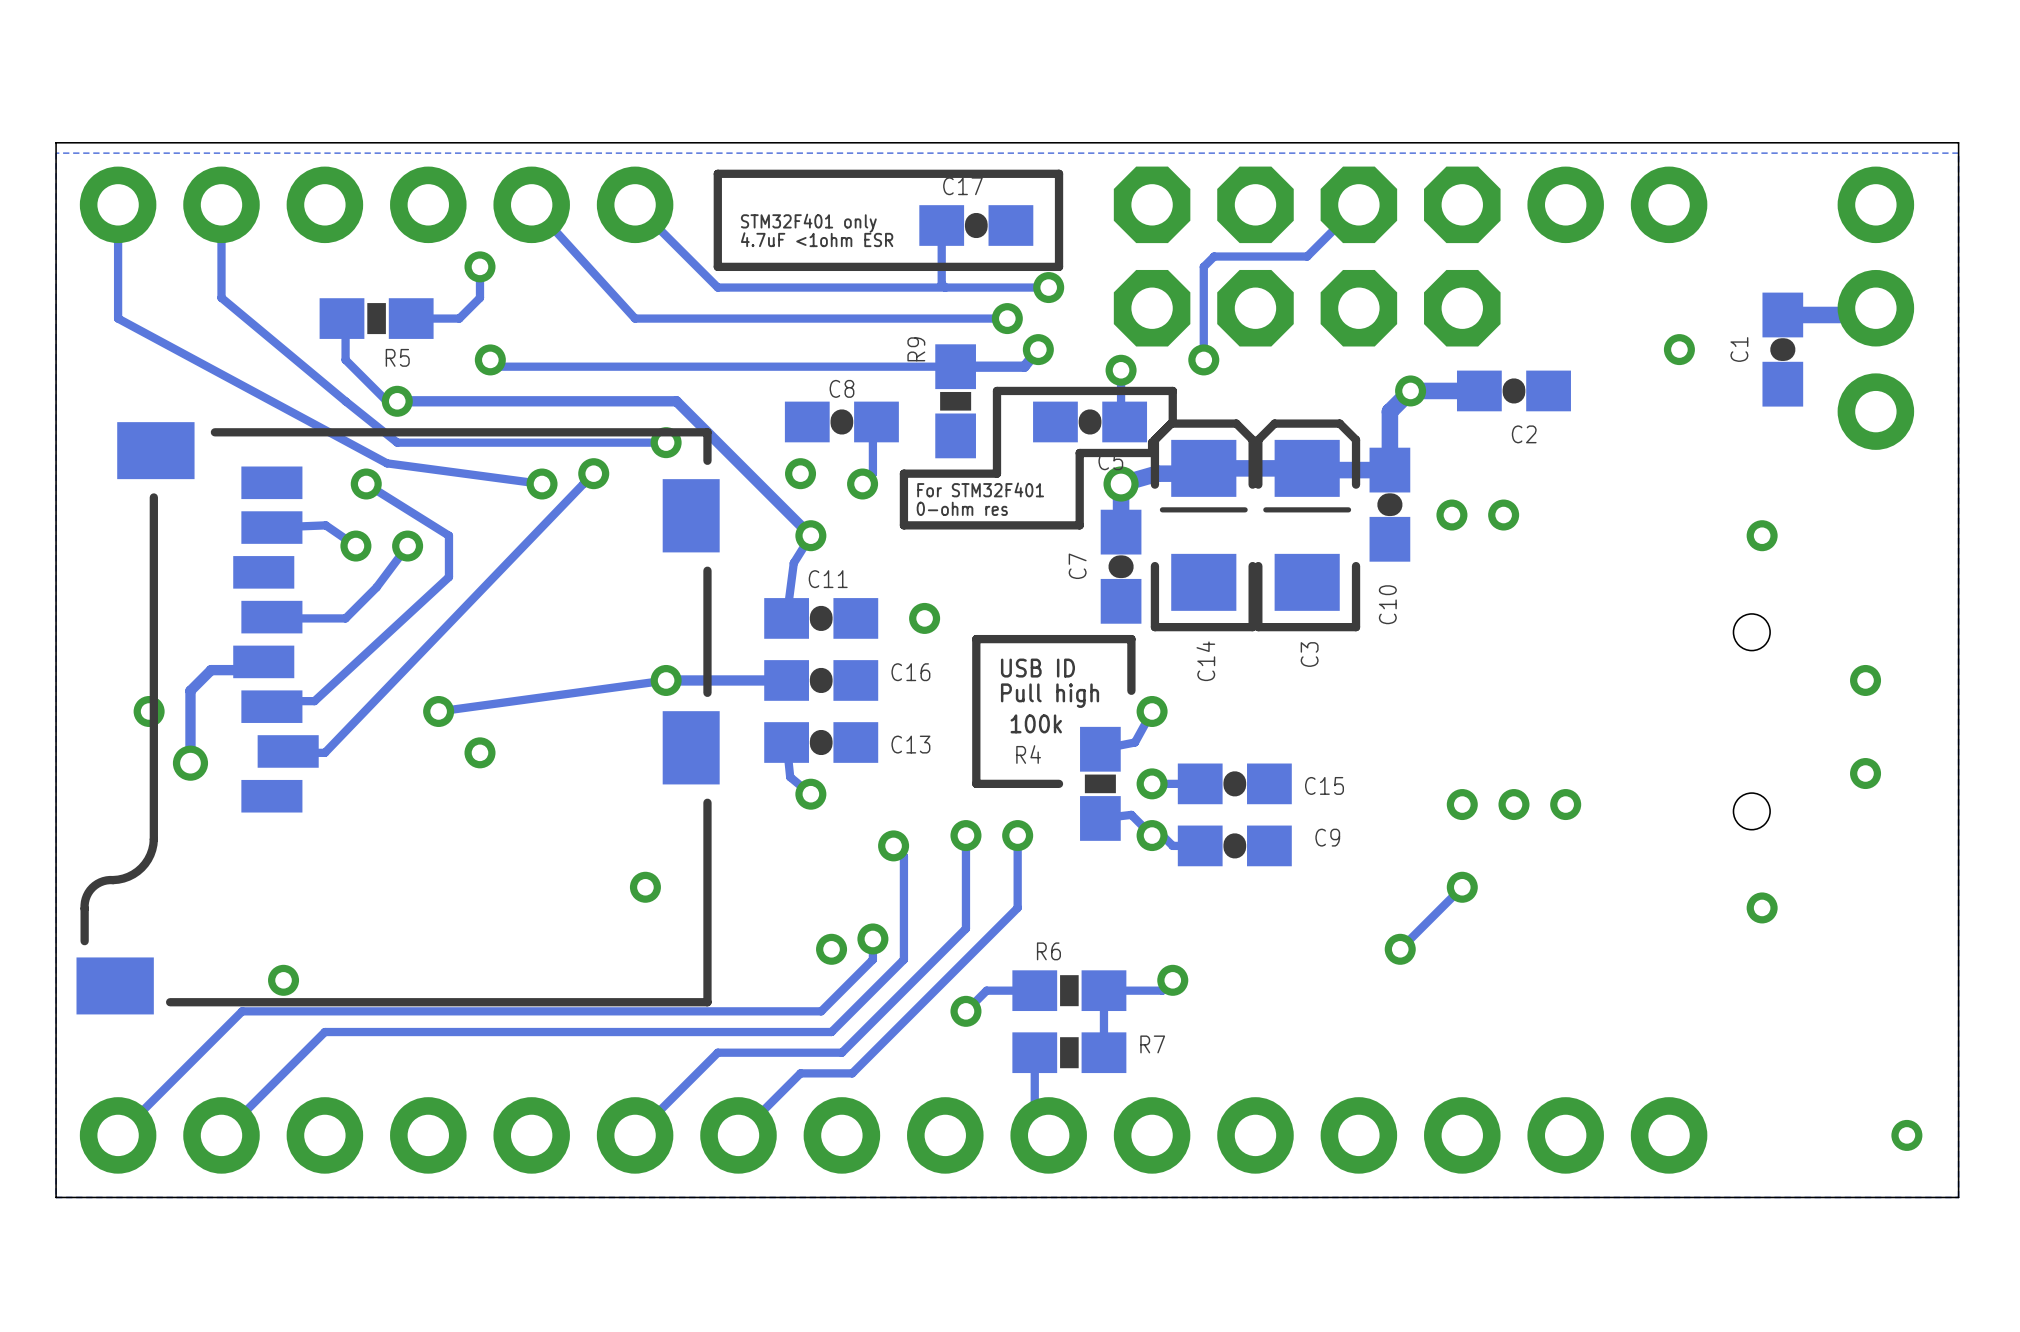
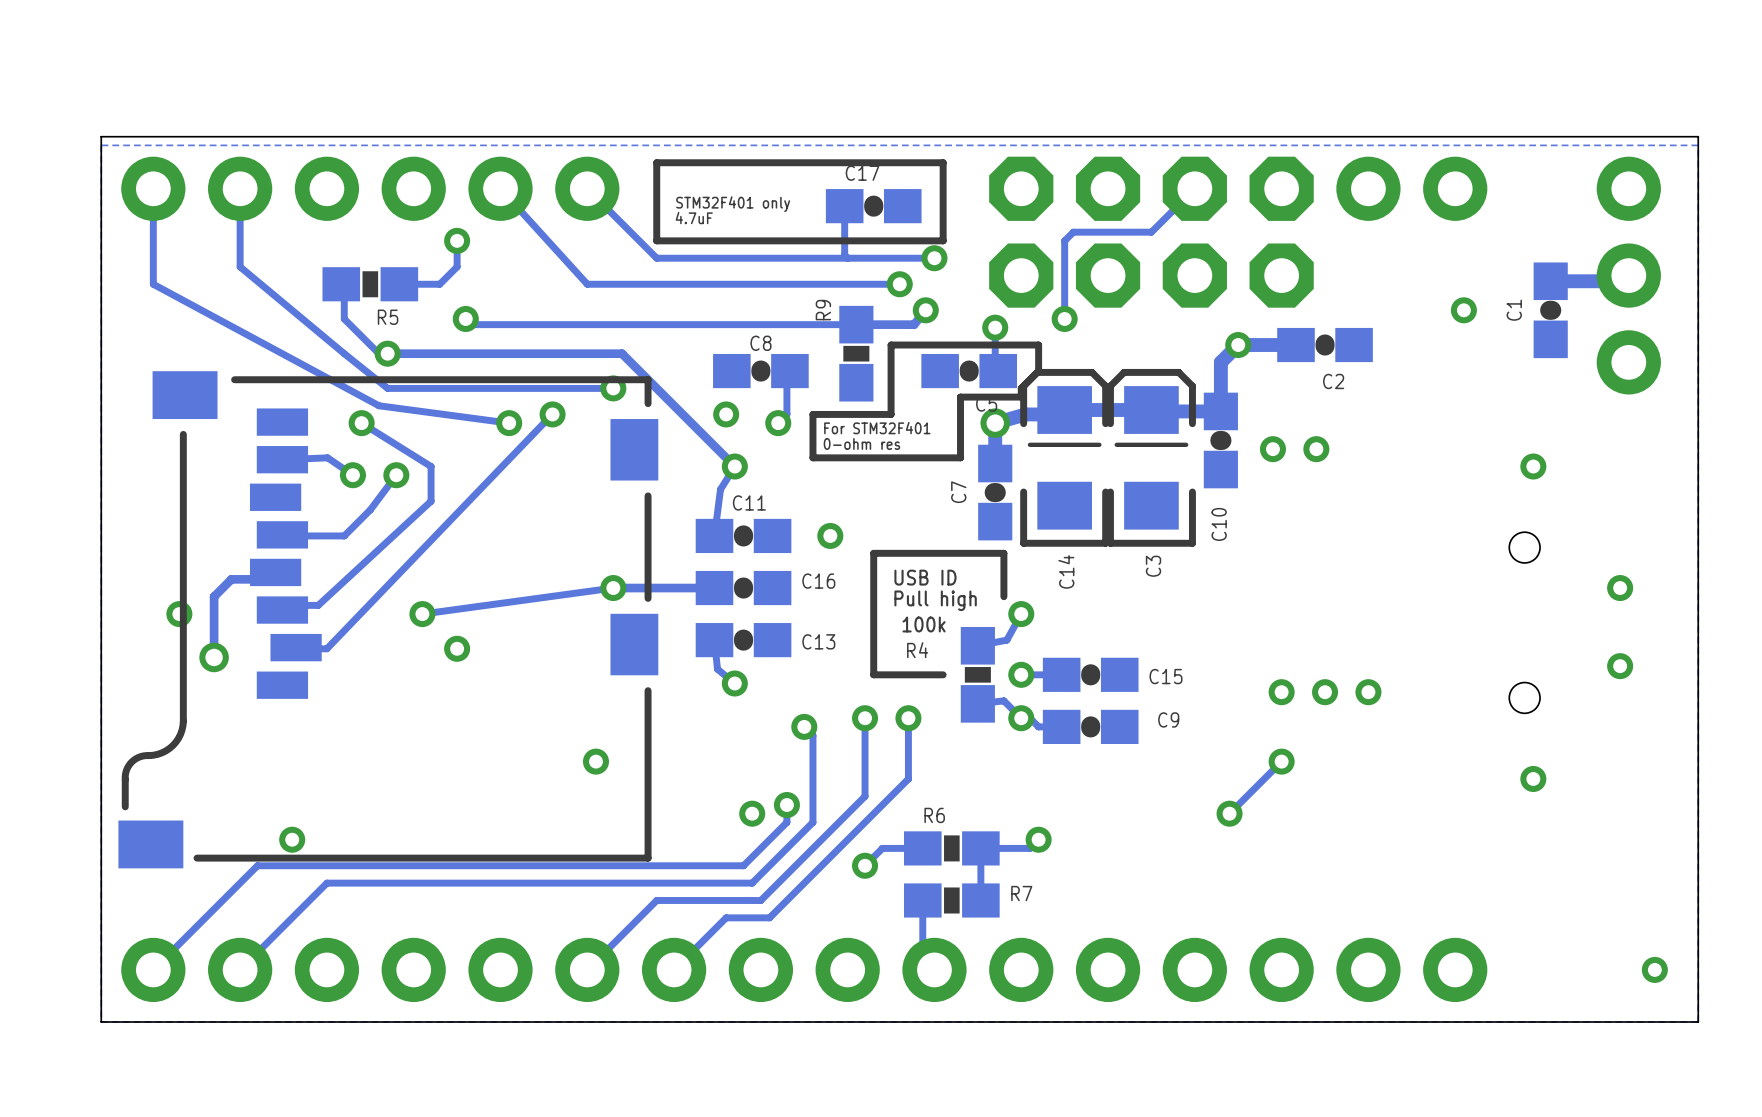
text: 4.7uF <1ohm ESR (817, 239) -> 4.7uF (694, 218)

